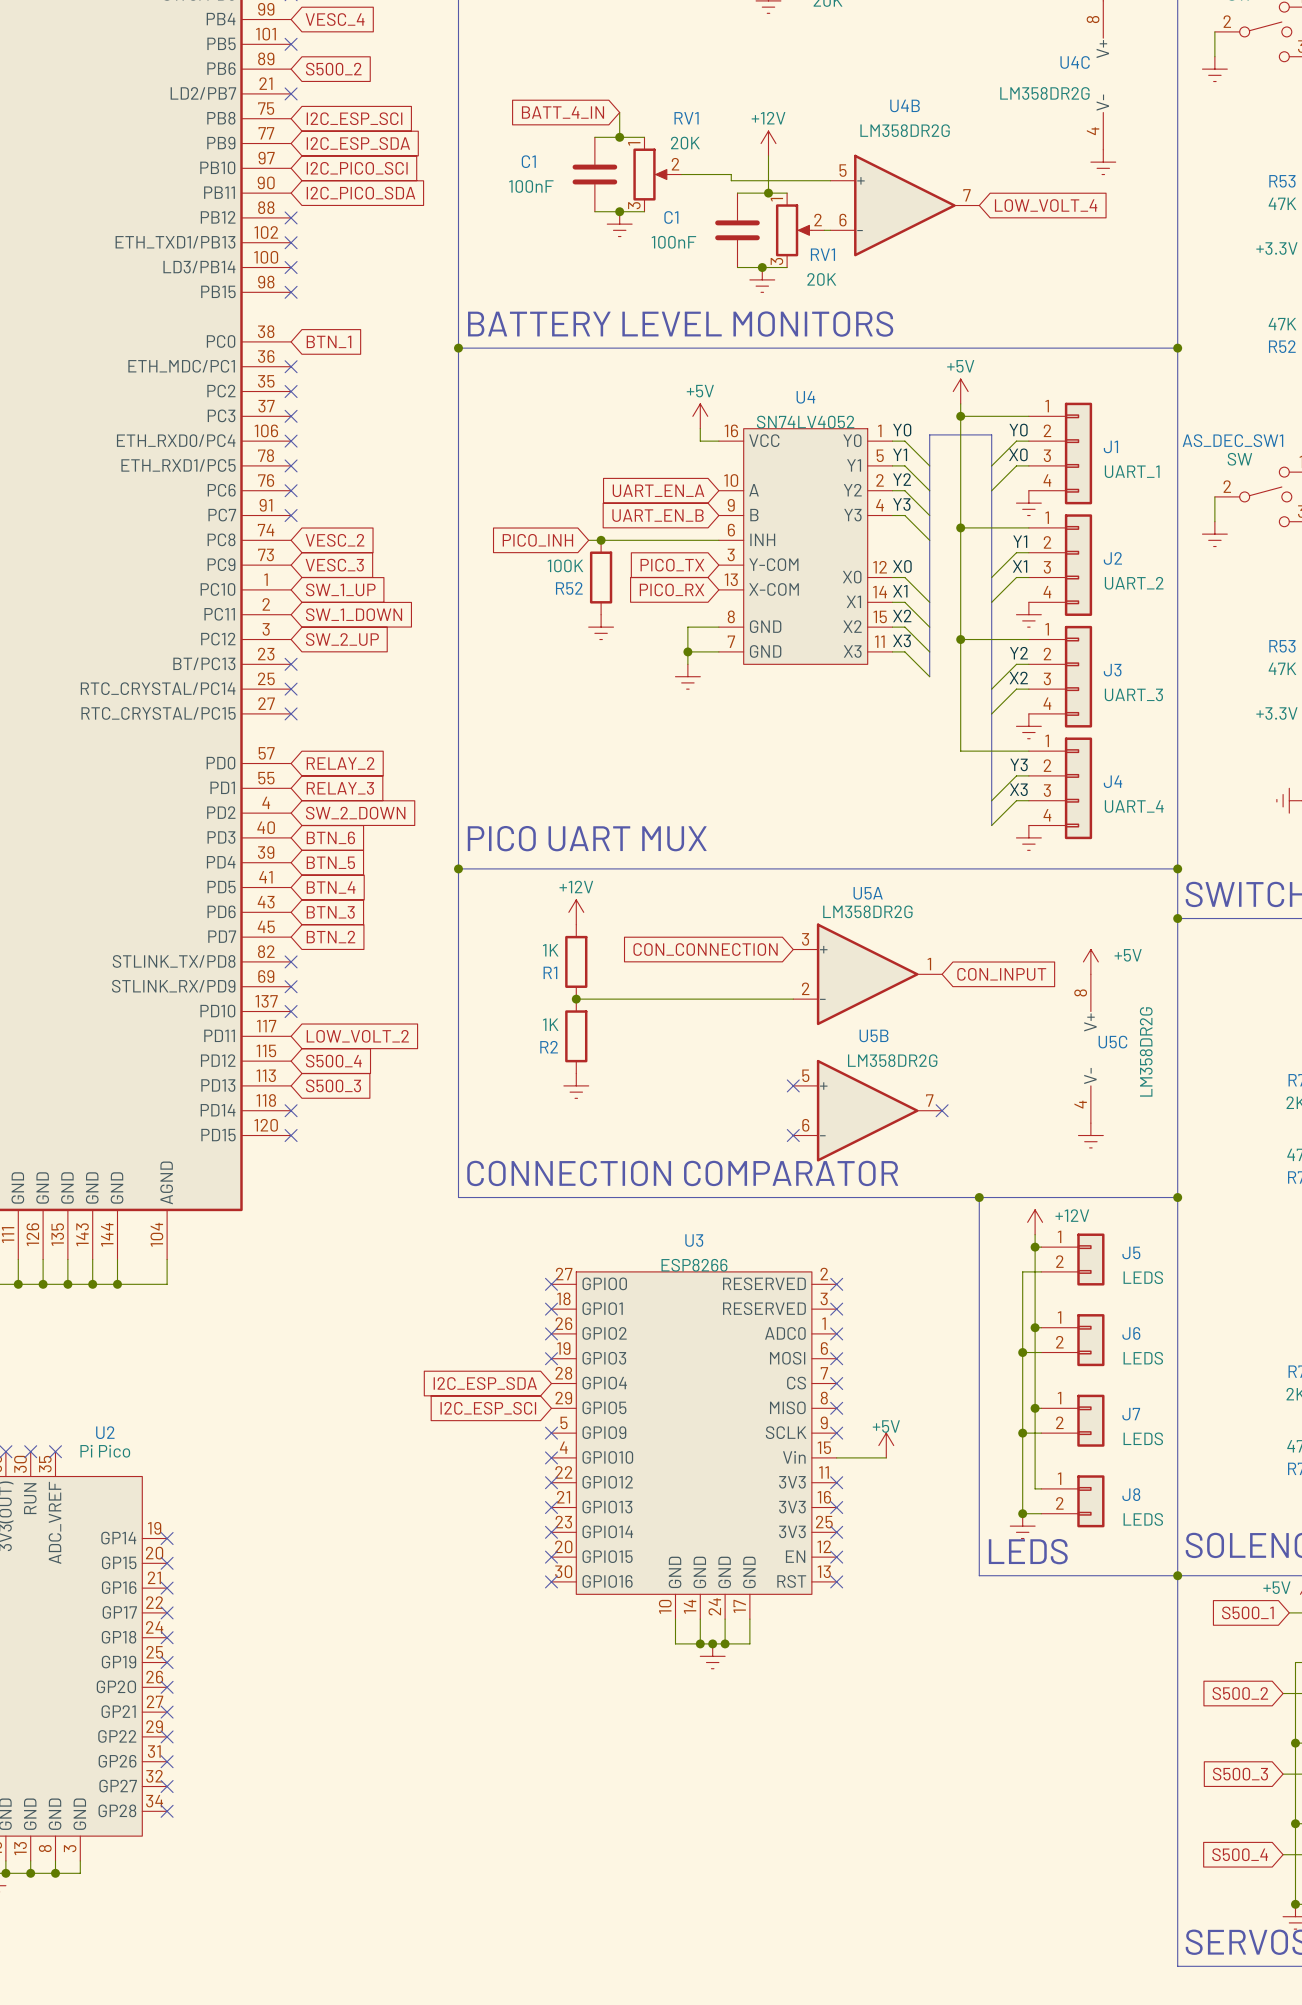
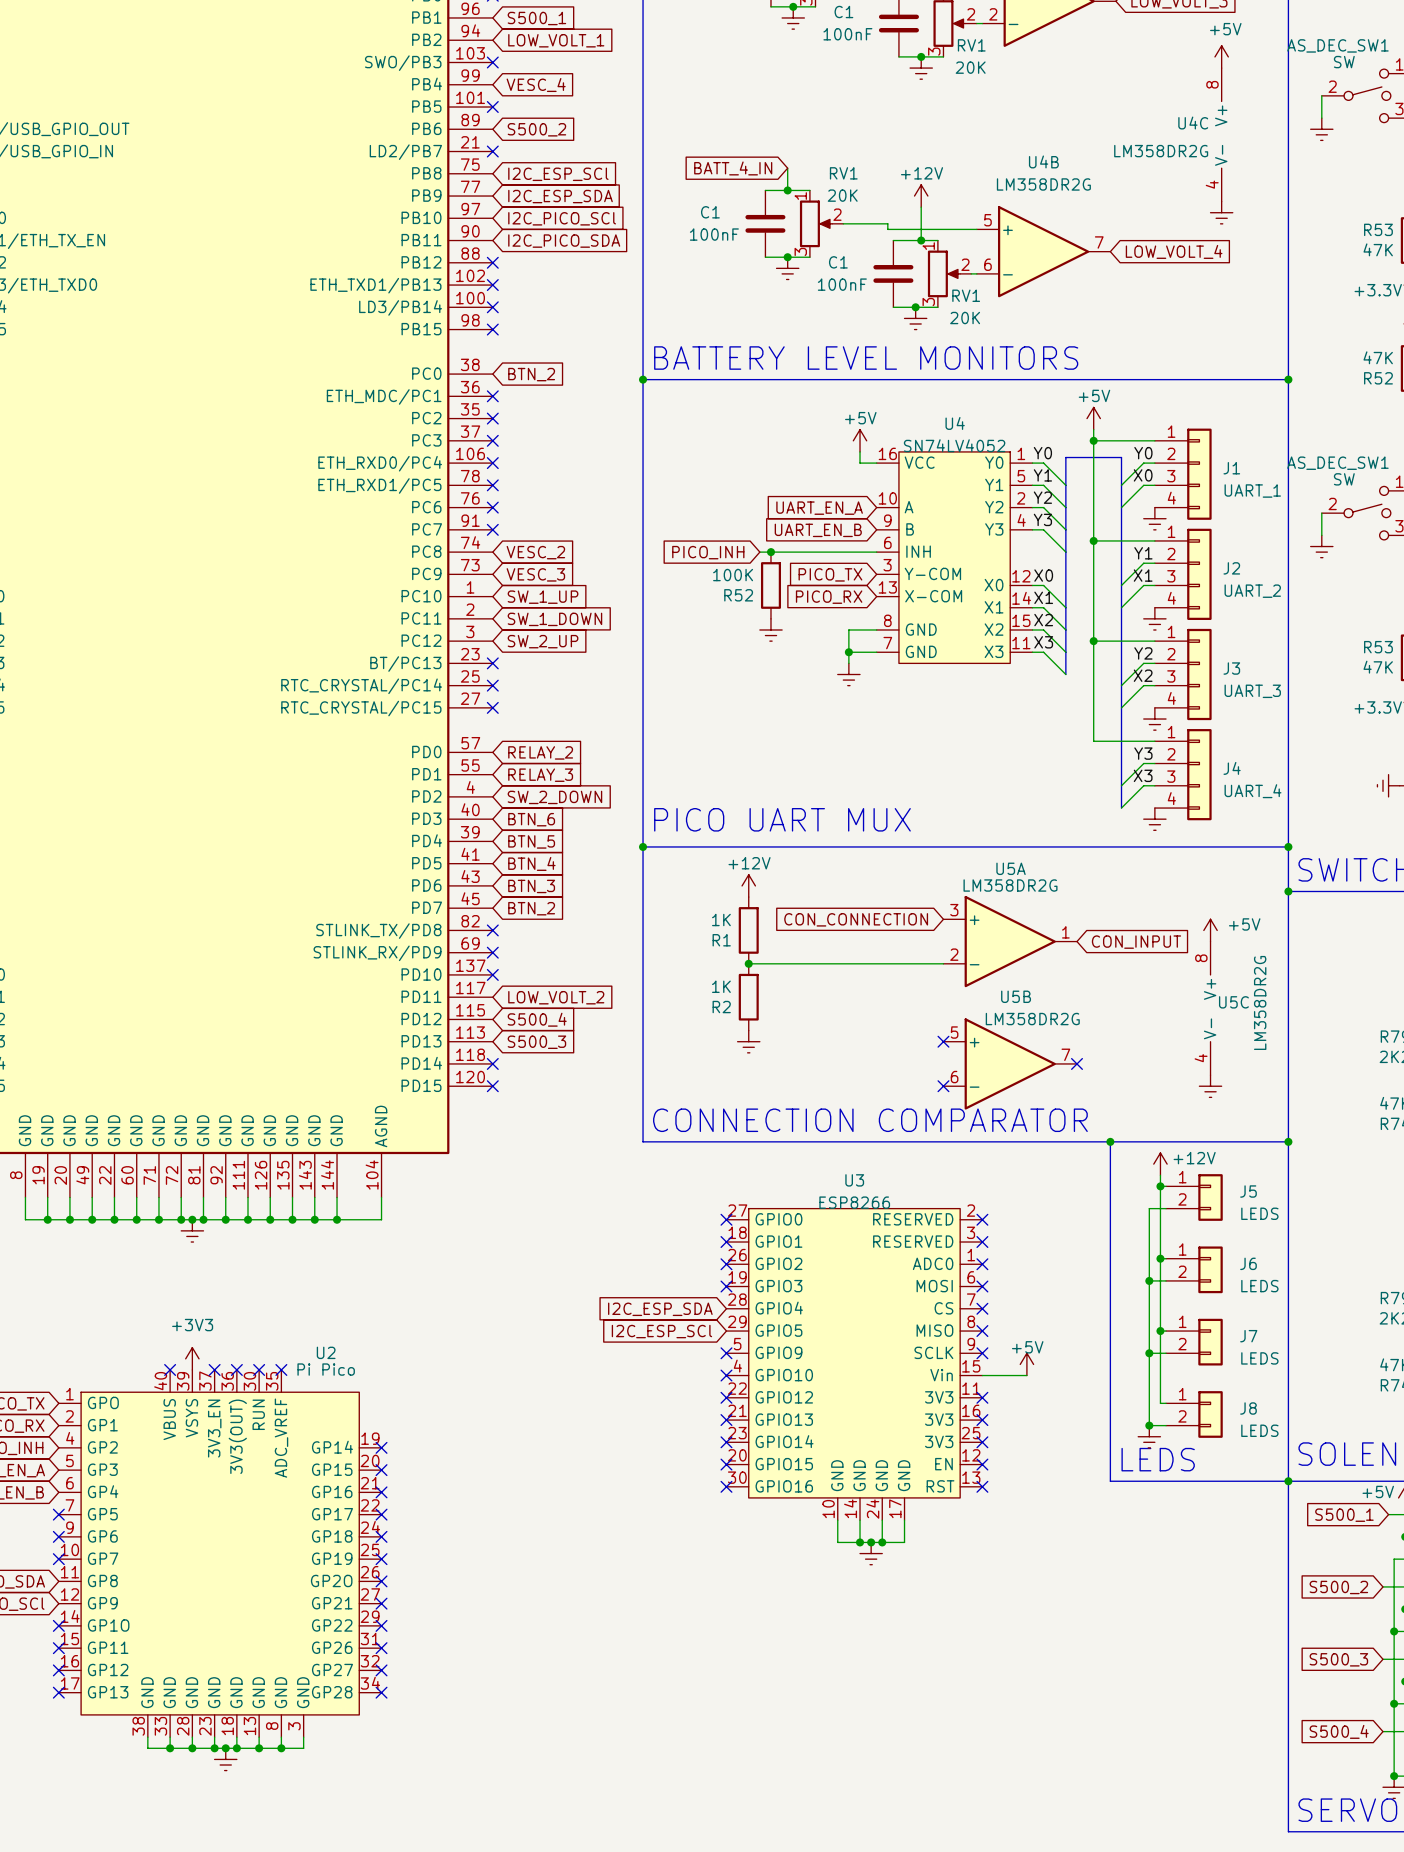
global label: BTN_1 (329, 341) -> BTN_2 (531, 374)

